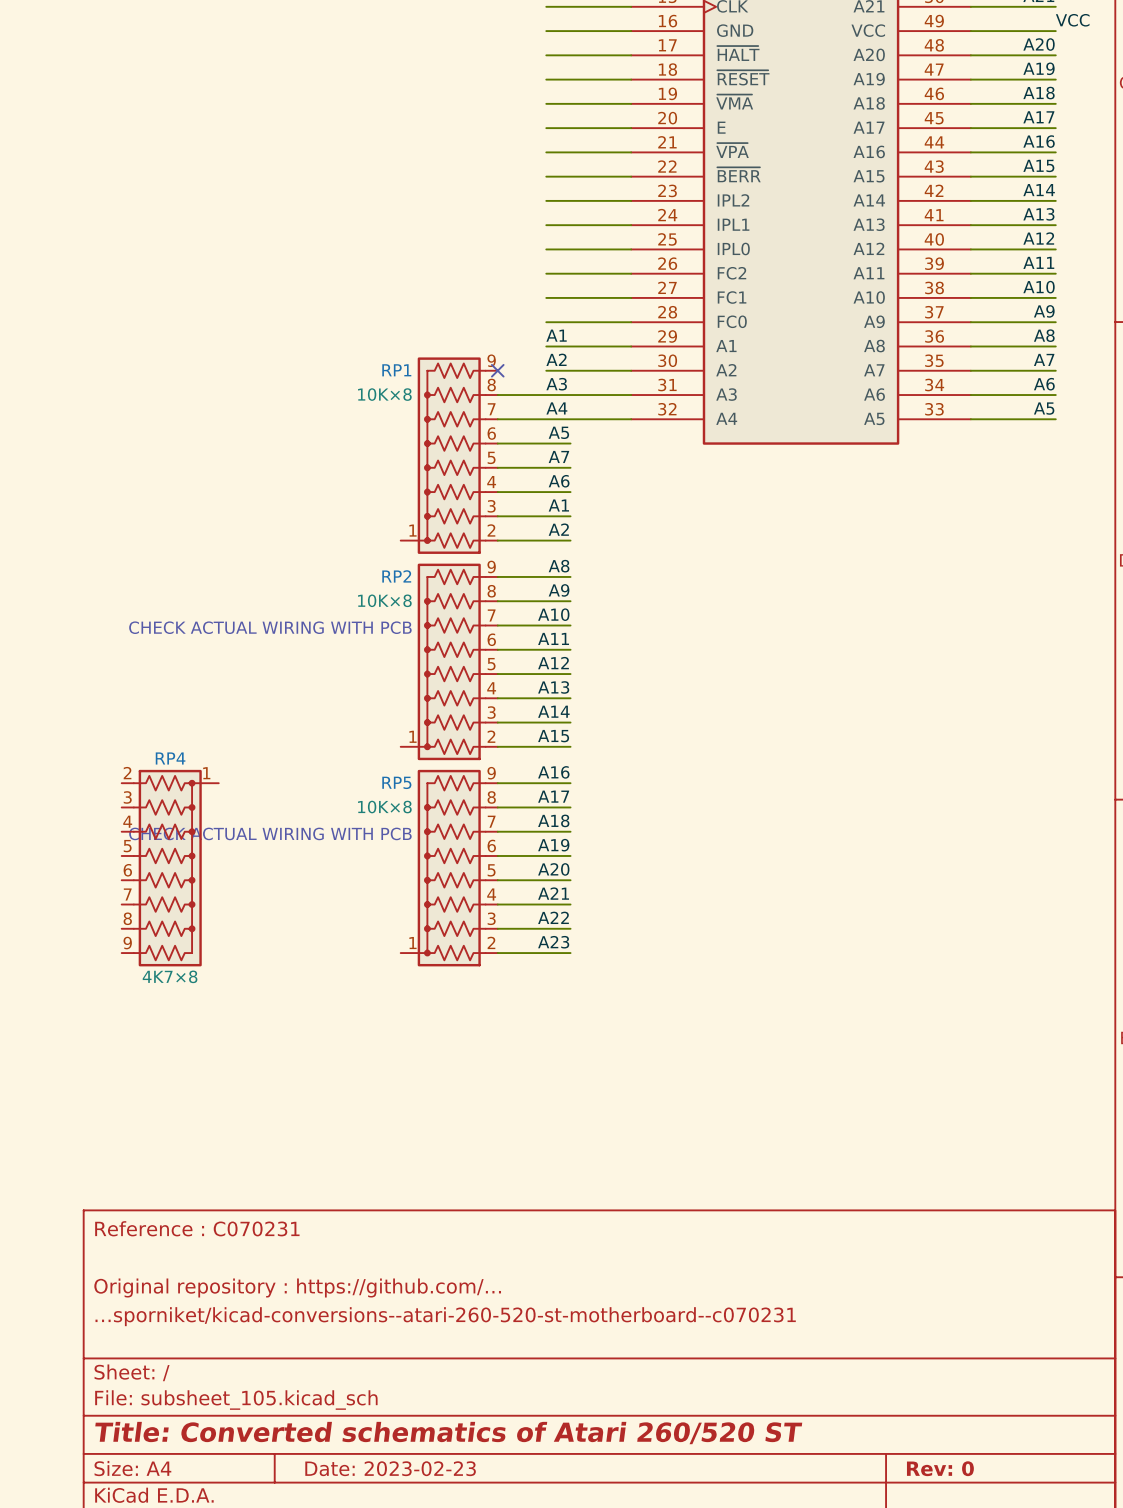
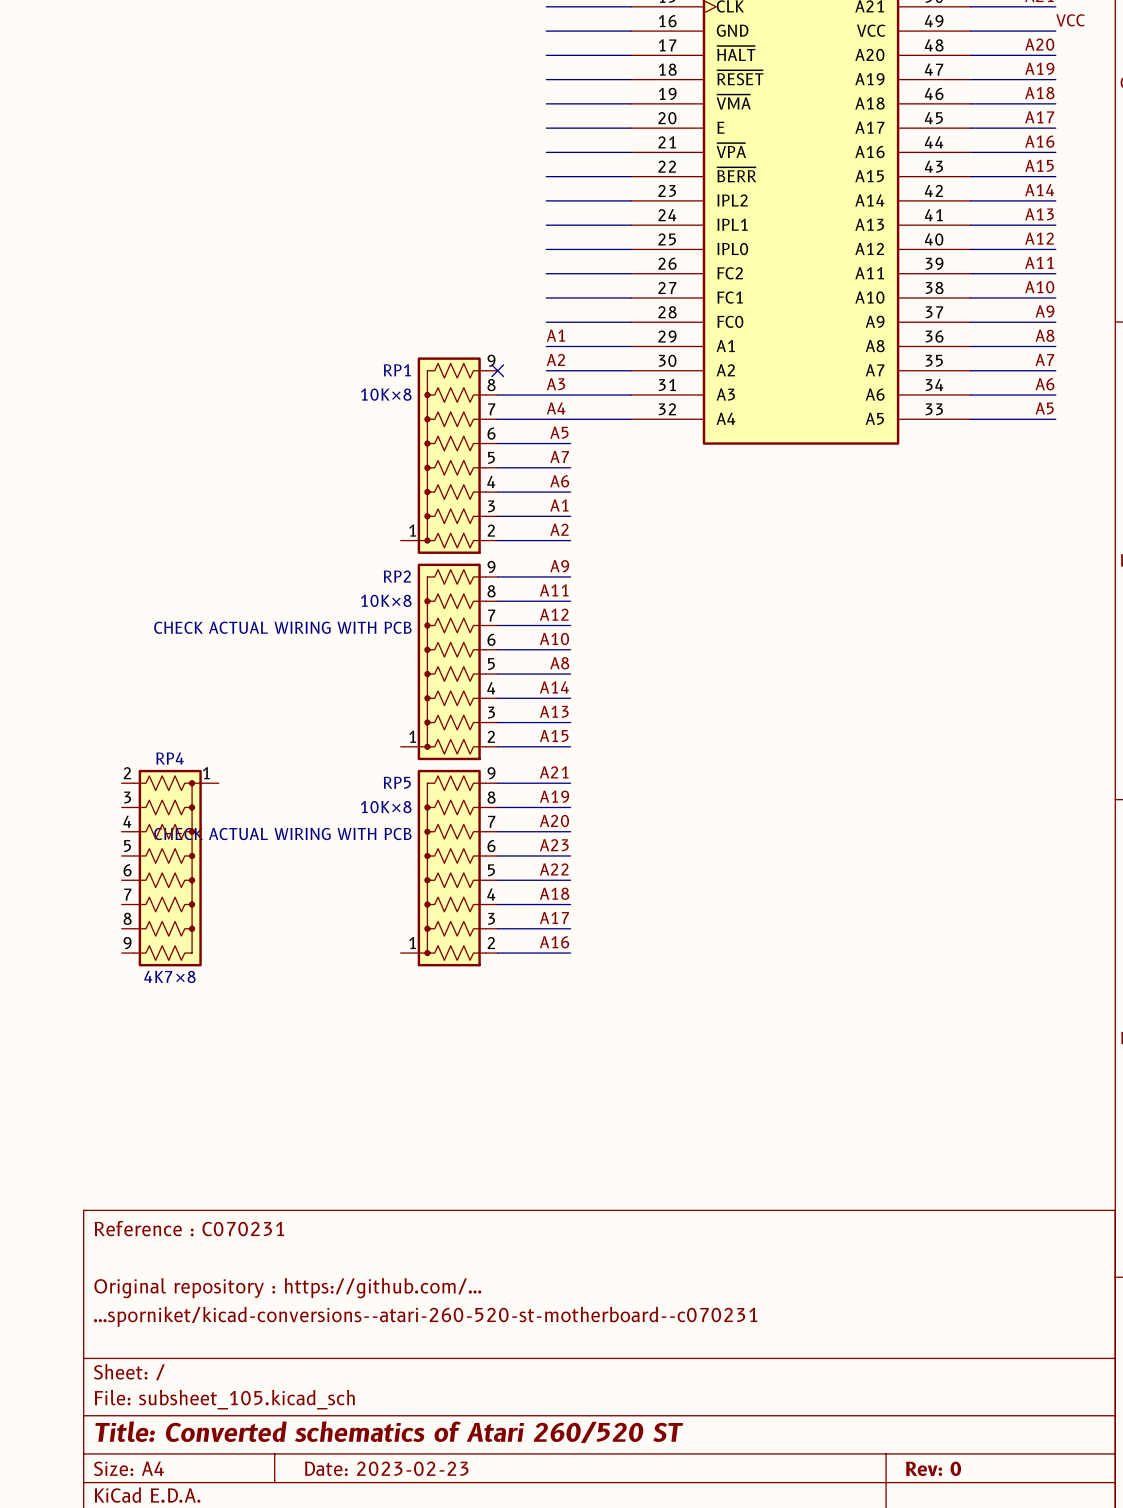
label: A8 (559, 566) -> A9 (559, 566)
label: A9 (559, 590) -> A11 (554, 590)
label: A10 (553, 614) -> A12 (554, 614)
label: A11 (553, 638) -> A10 (554, 639)
label: A12 (553, 663) -> A8 (559, 663)
label: A13 (553, 687) -> A14 (554, 687)
label: A14 (553, 711) -> A13 (554, 711)
label: A16 (553, 772) -> A21 (554, 772)
label: A17 (553, 796) -> A19 (554, 796)
label: A18 (553, 820) -> A20 (554, 820)
label: A19 (553, 845) -> A23 (554, 845)
label: A20 (553, 869) -> A22 (554, 869)
label: A21 (553, 893) -> A18 (554, 893)
label: A22 (553, 917) -> A17 (554, 917)
label: A23 (553, 942) -> A16 (554, 942)

